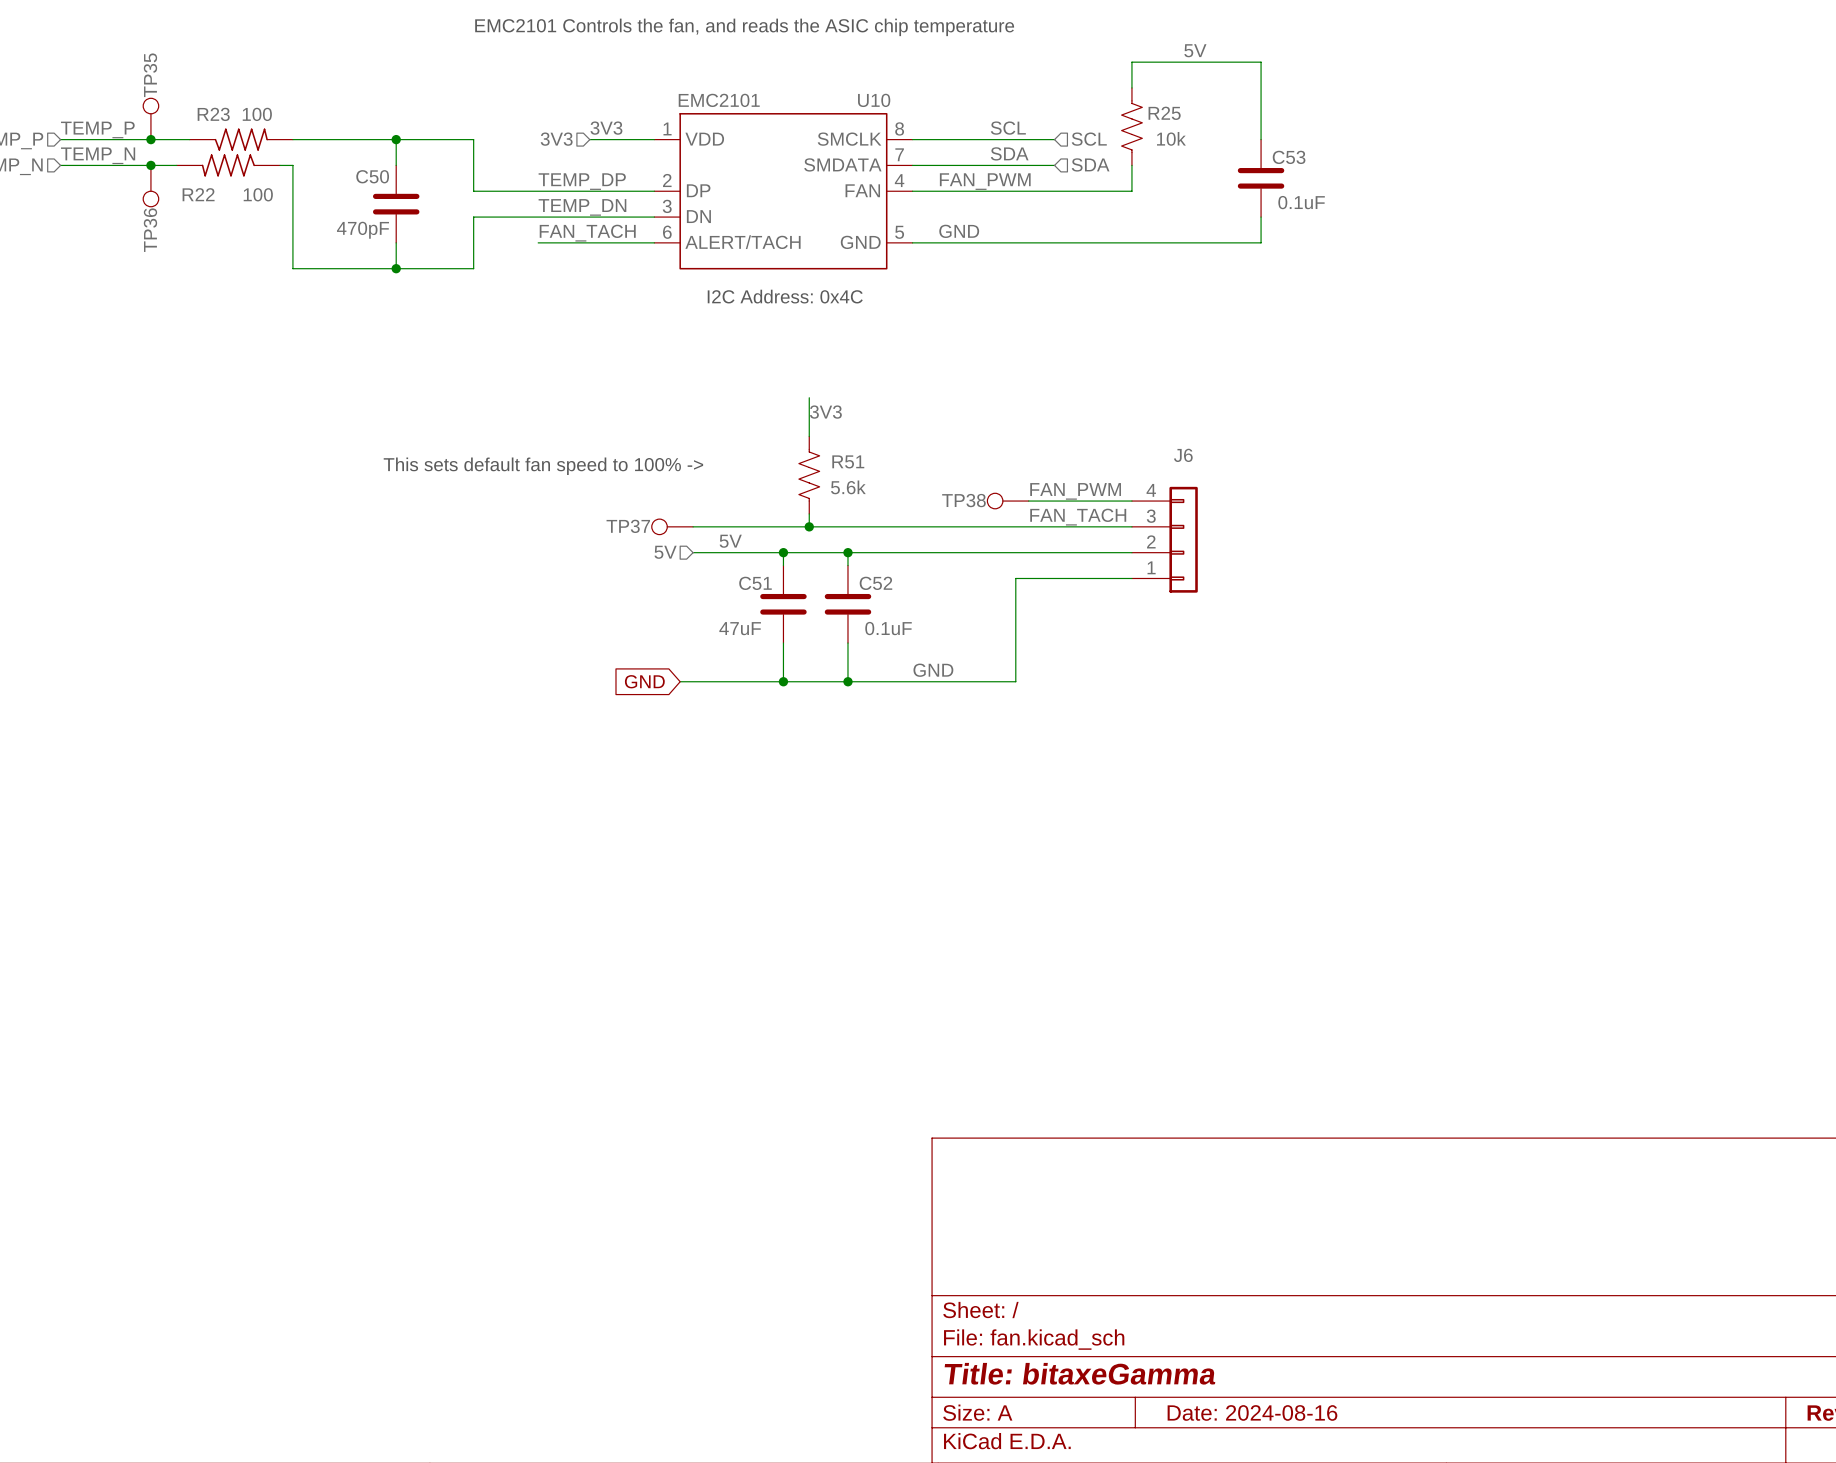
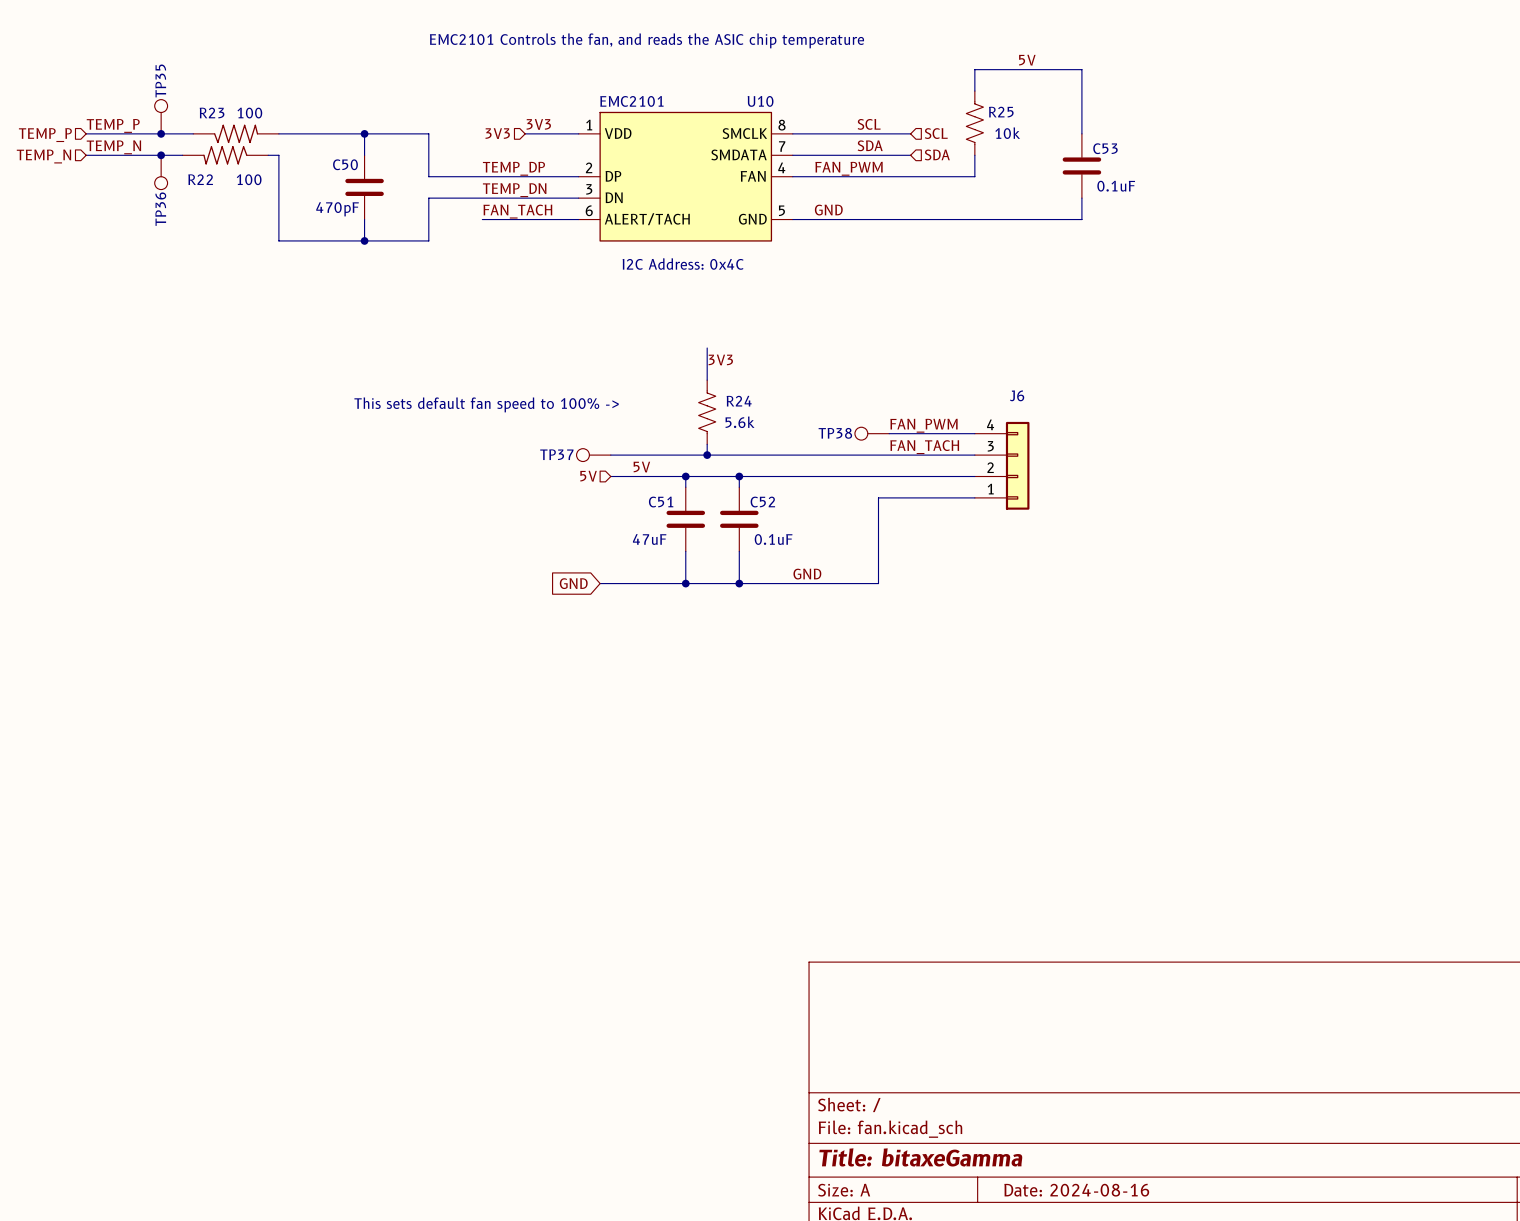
R51 name: R51 (848, 461) -> R24 (739, 401)

